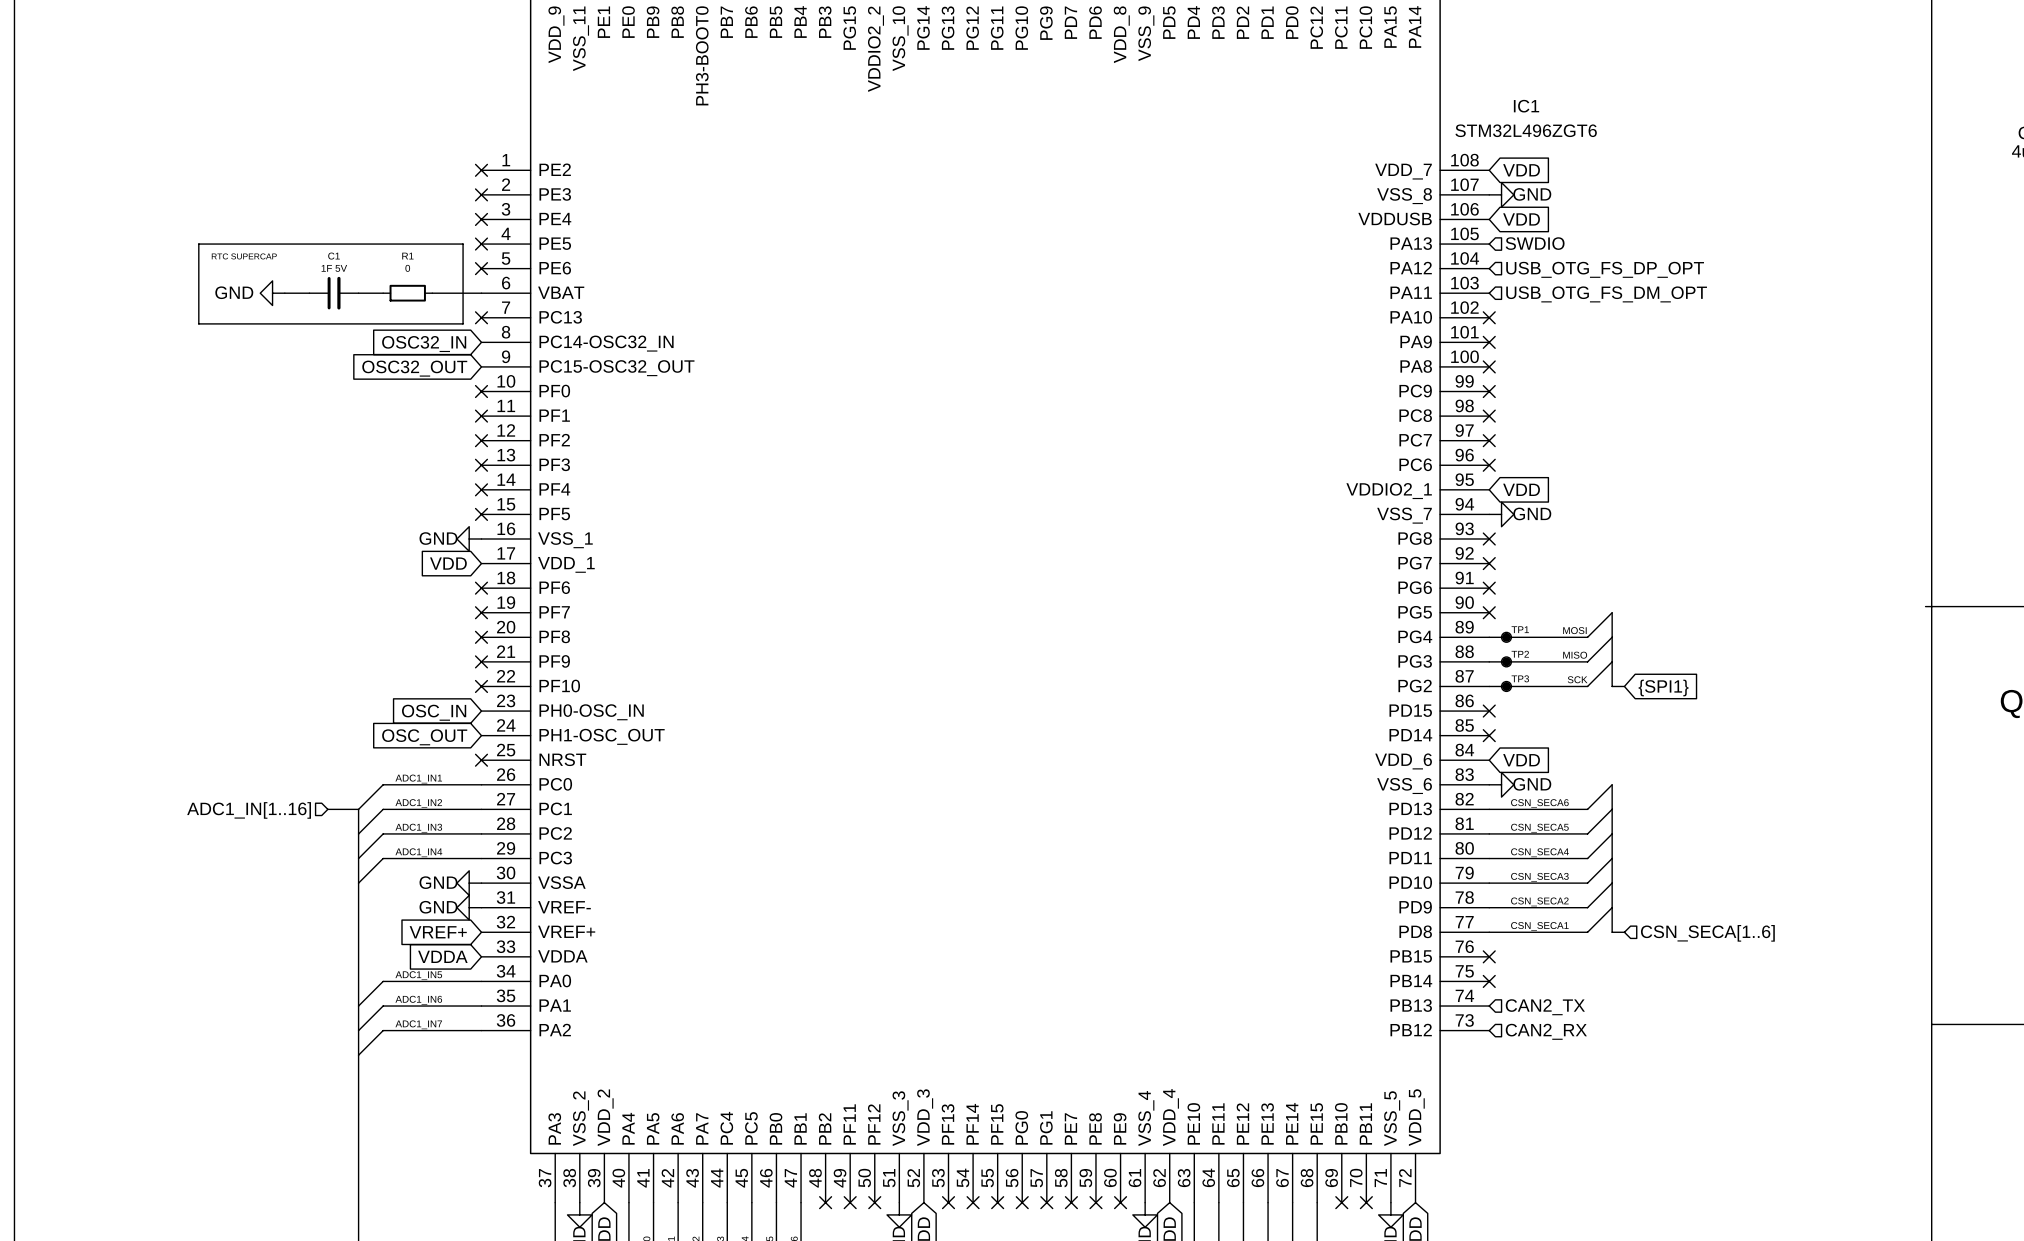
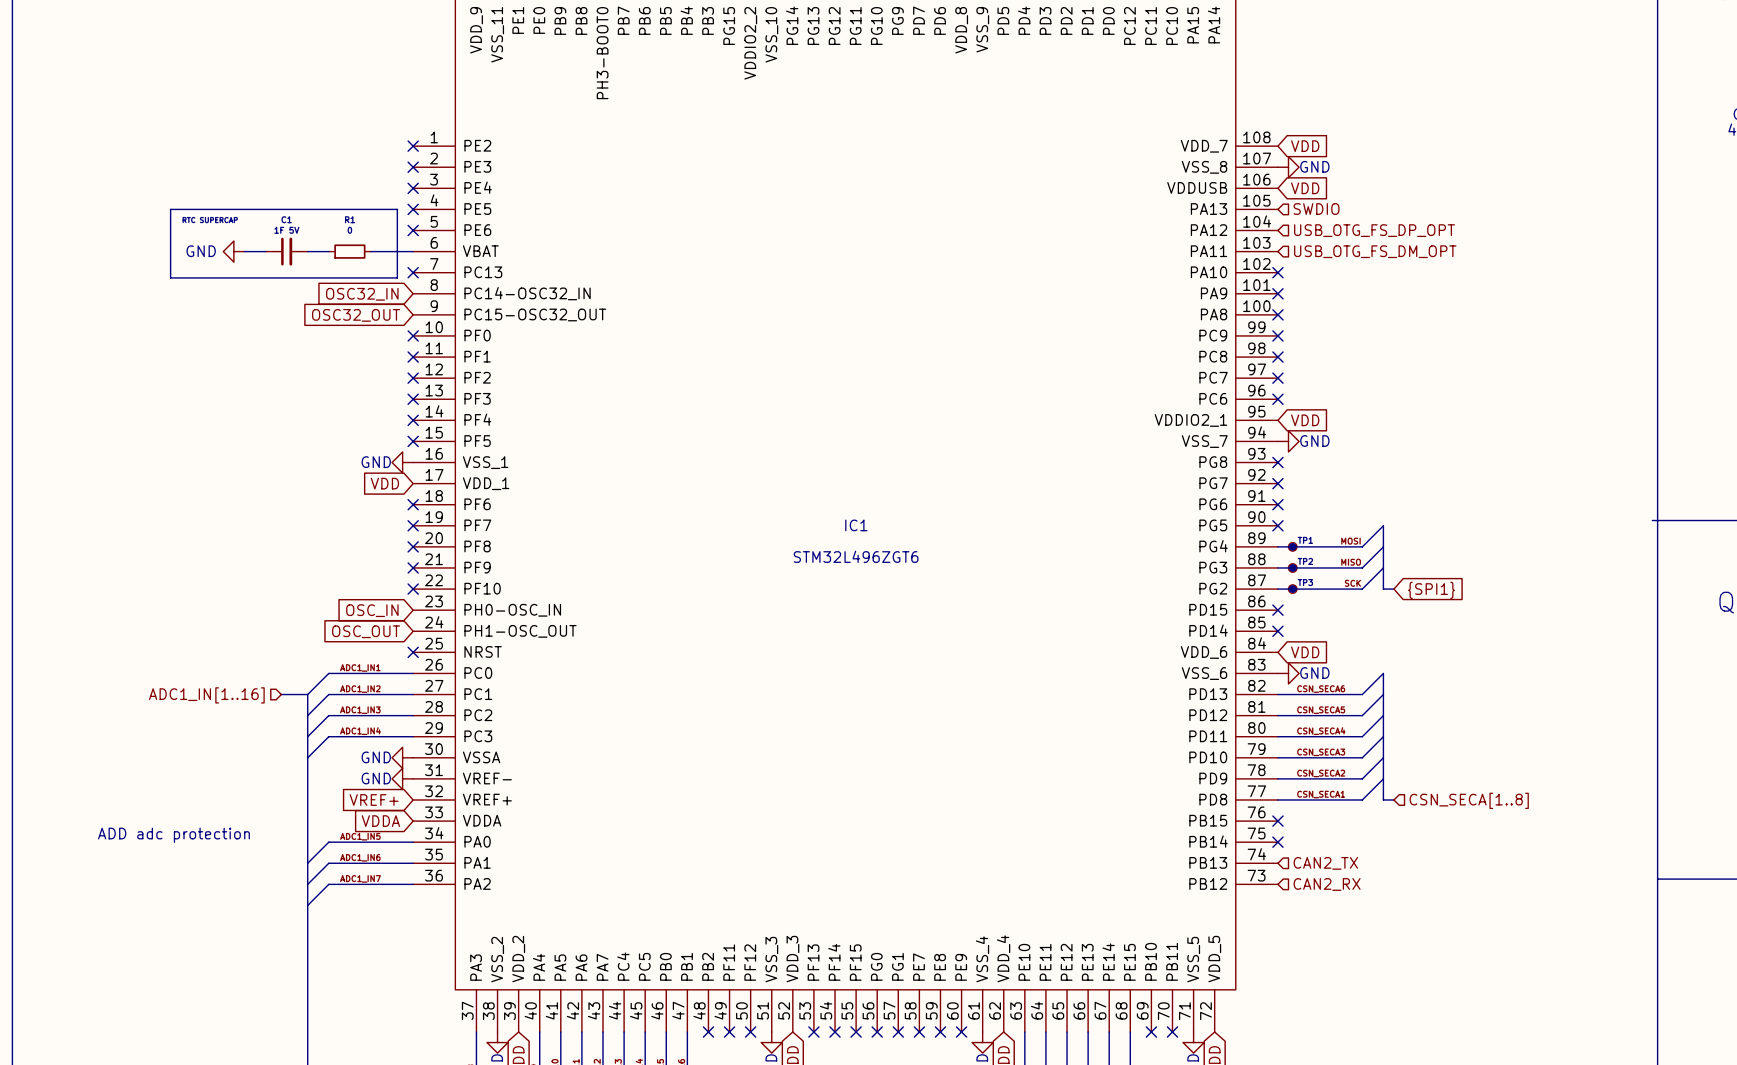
IC1 name position: IC1 (1526, 106) -> IC1 (856, 525)
IC1 value position: STM32L496ZGT6 (1526, 130) -> STM32L496ZGT6 (856, 556)
hierarchical label: CSN_SECA[1..6] (1707, 933) -> CSN_SECA[1..8] (1469, 800)
text: none -> ADD adc protection (173, 835)

